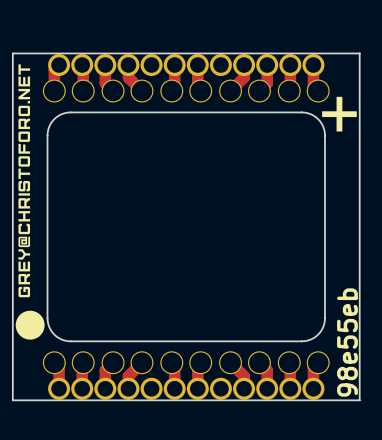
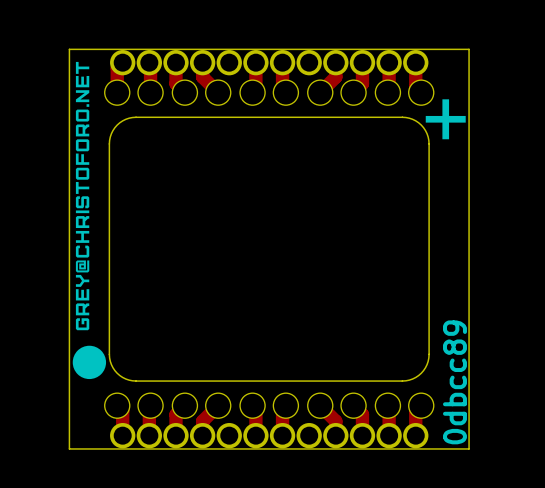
text: 98e55eb (347, 342) -> 0dbcc89 (454, 382)

